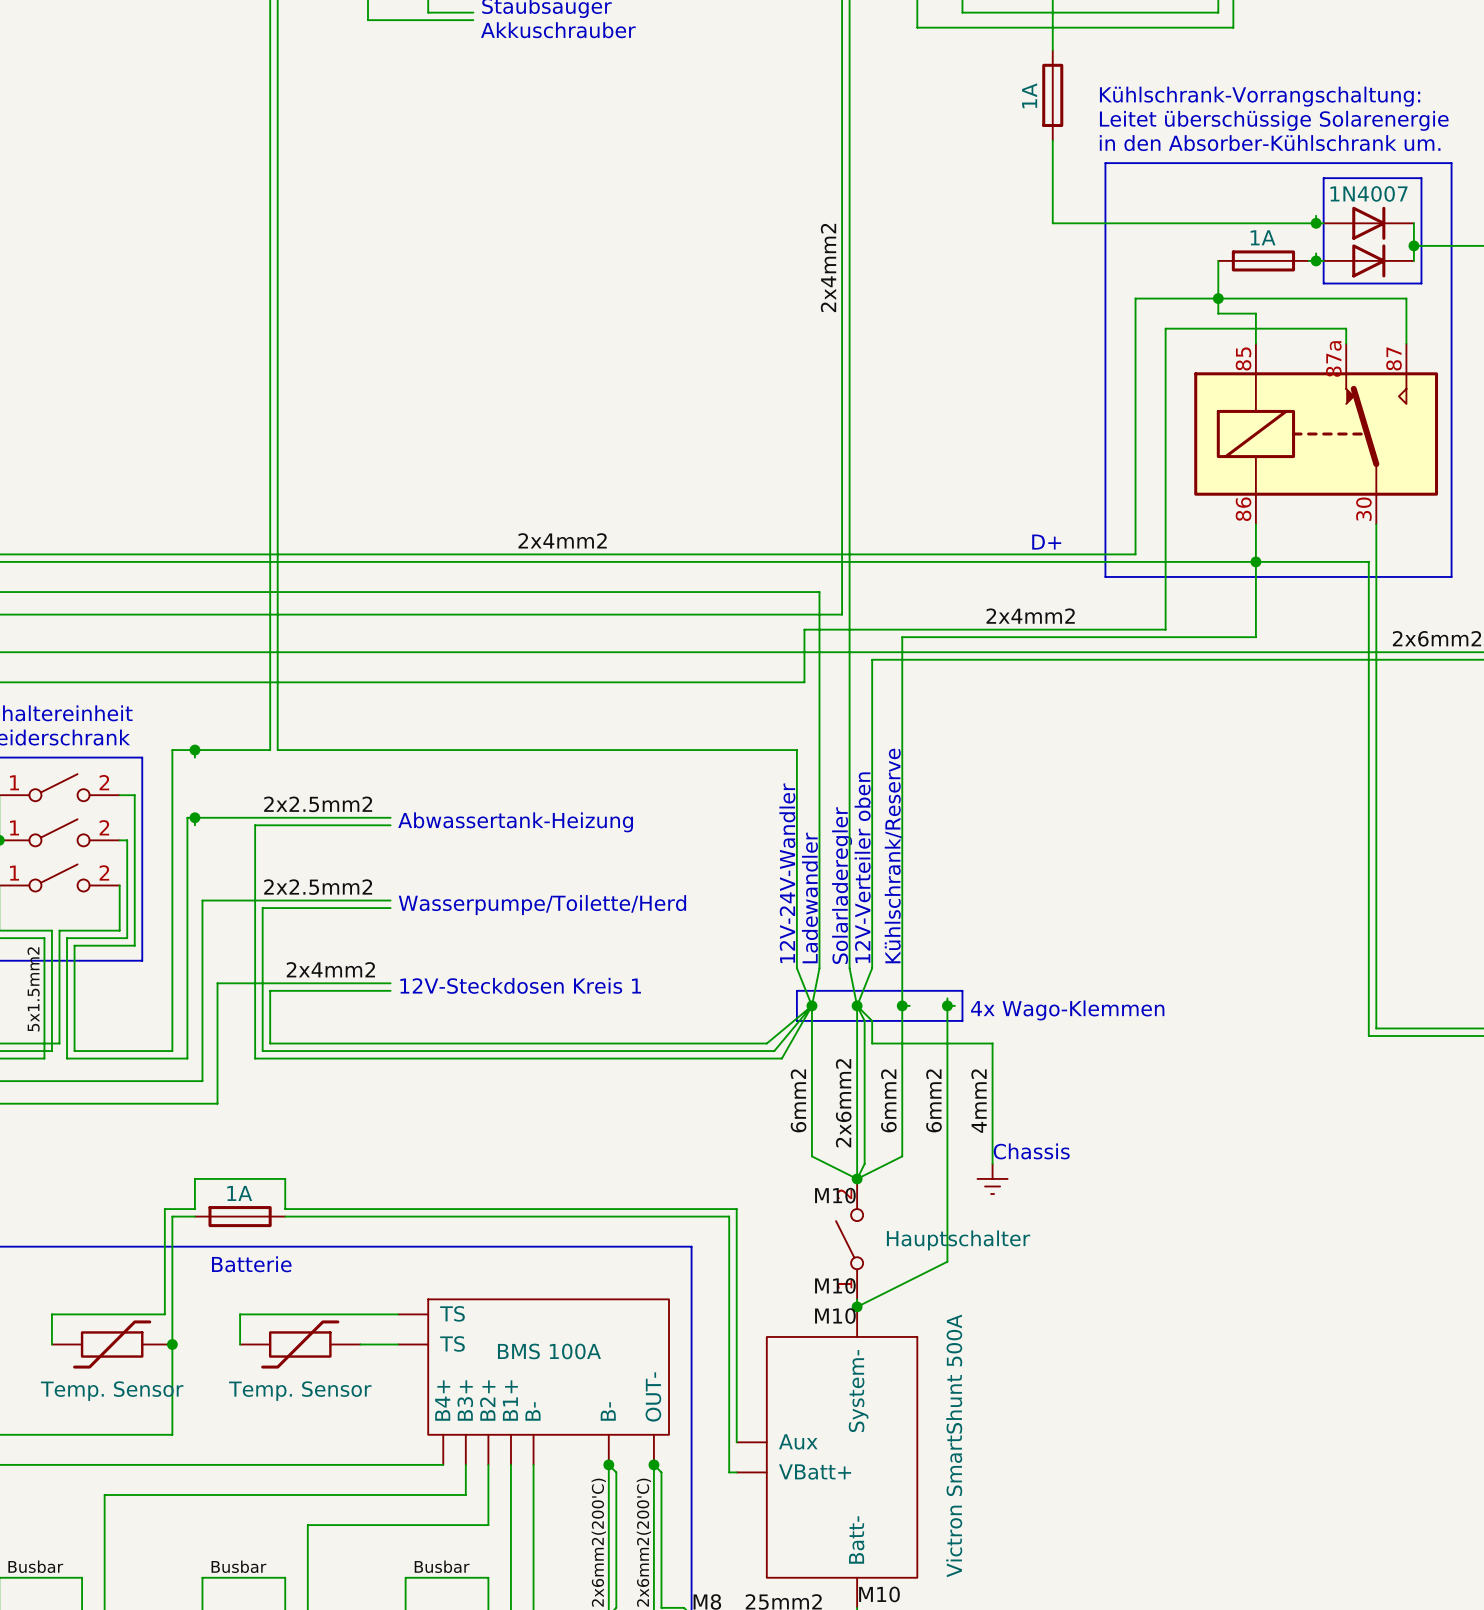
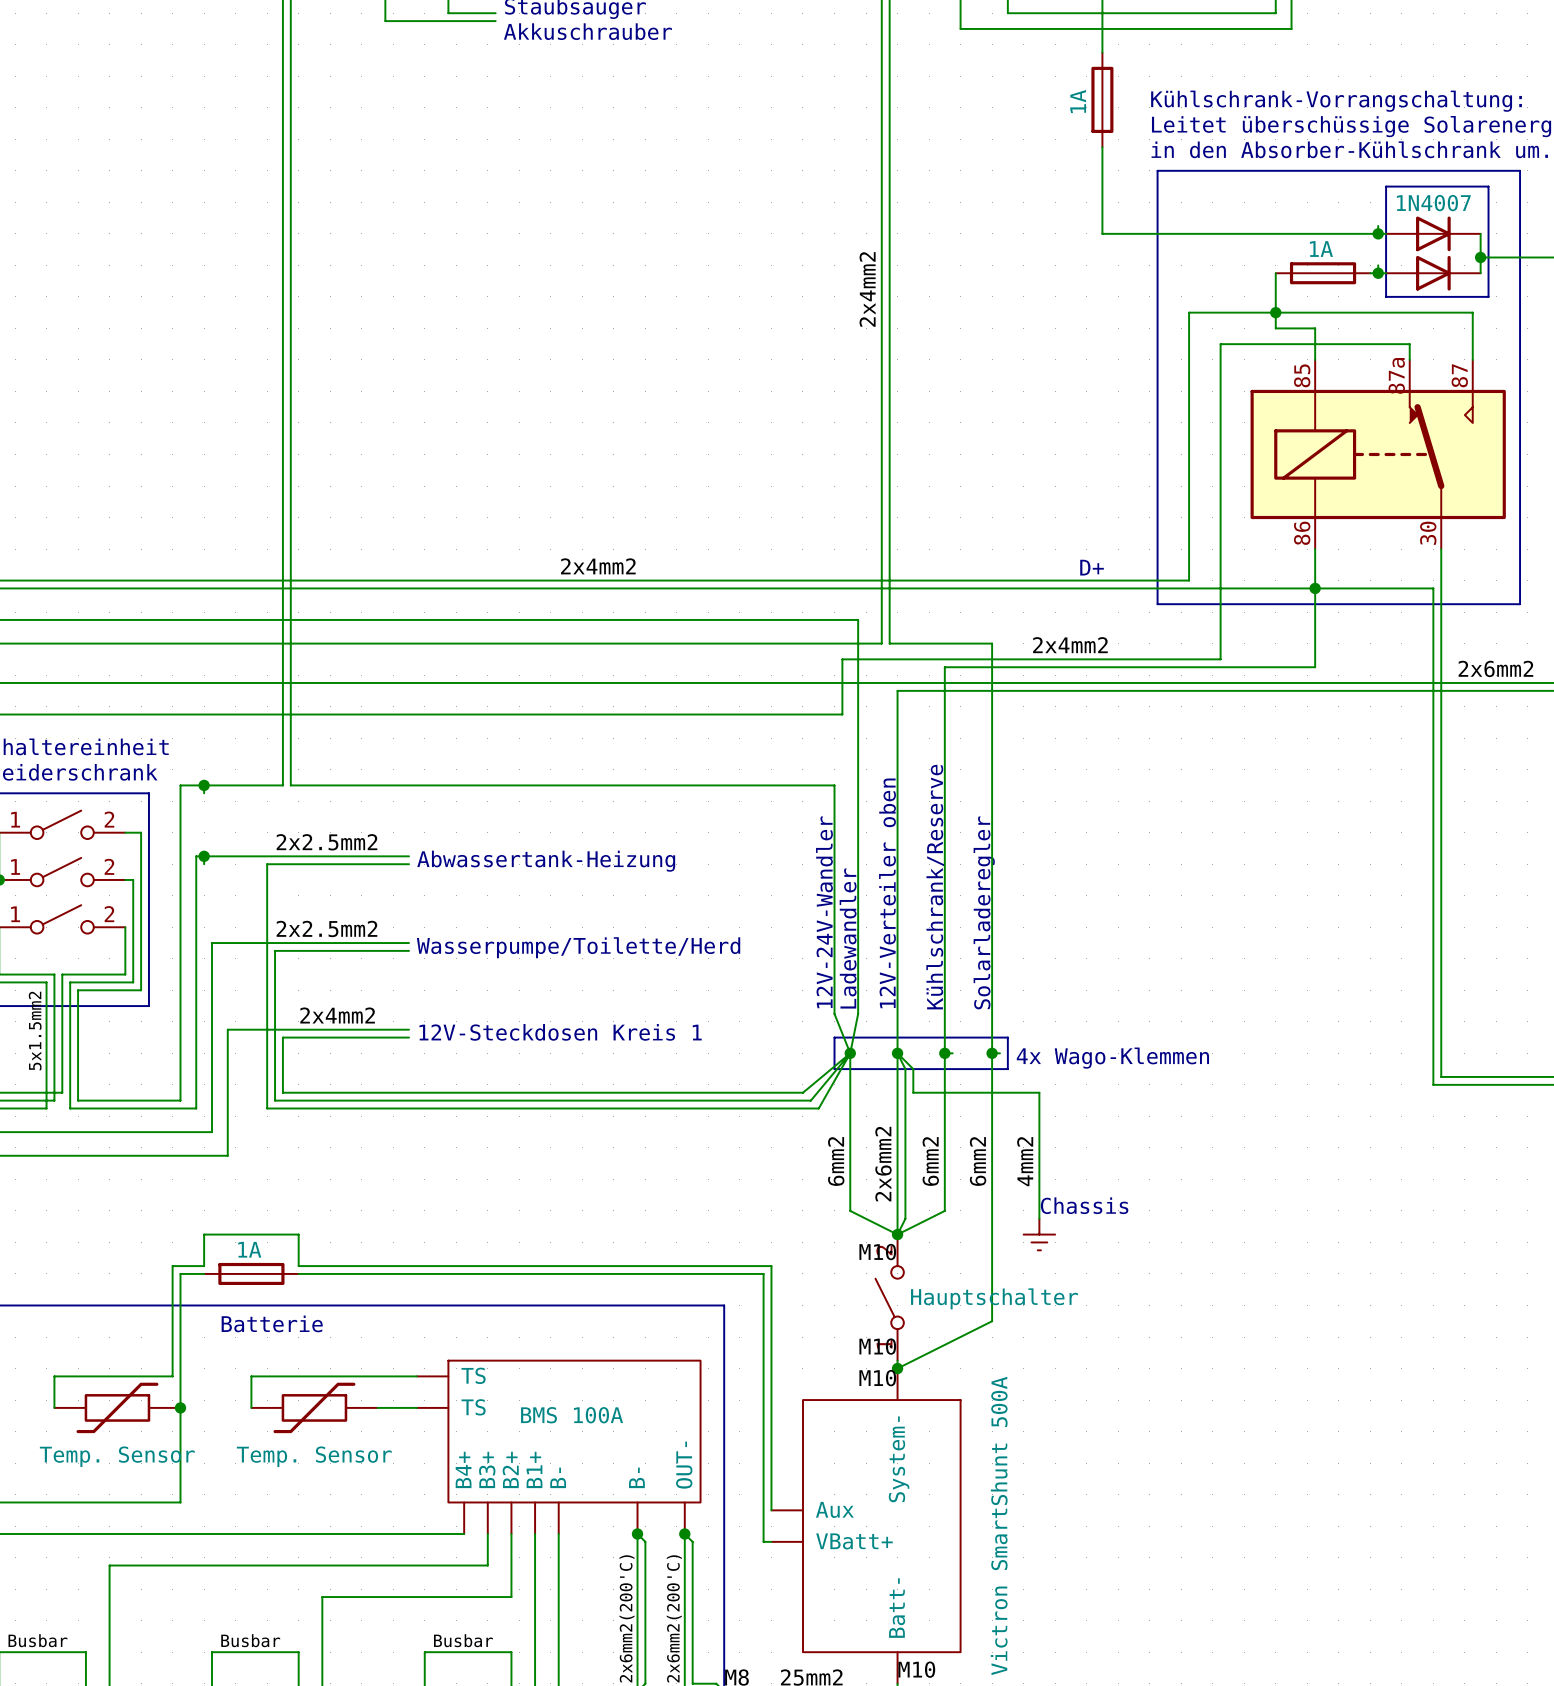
wire: (849, 614) (849, 968) (857, 1005) (872, 968) (872, 659) -> (889, 643) (992, 643) (992, 1045)
wire: none -> (913, 690) (897, 690) (897, 1053)
text position: 12V-Verteiler oben (862, 867) -> 12V-Verteiler oben (887, 893)
text position: Solarladeregler (842, 885) -> Solarladeregler (984, 912)

